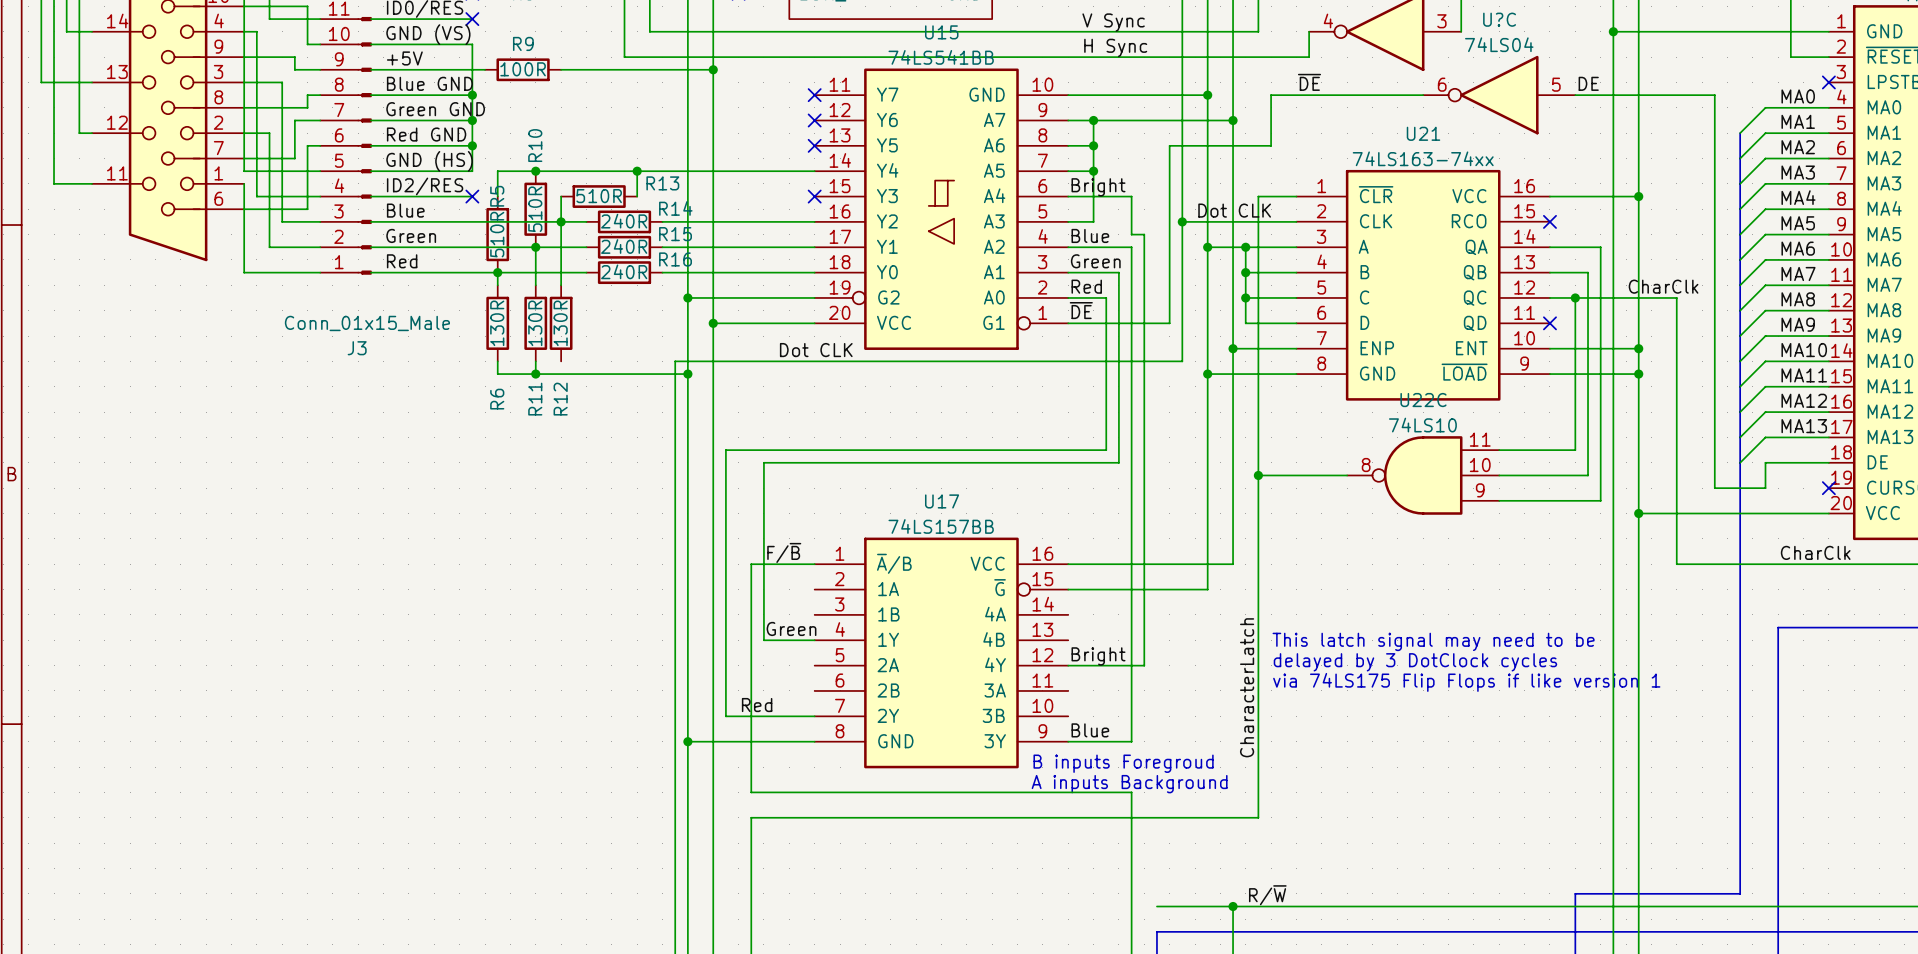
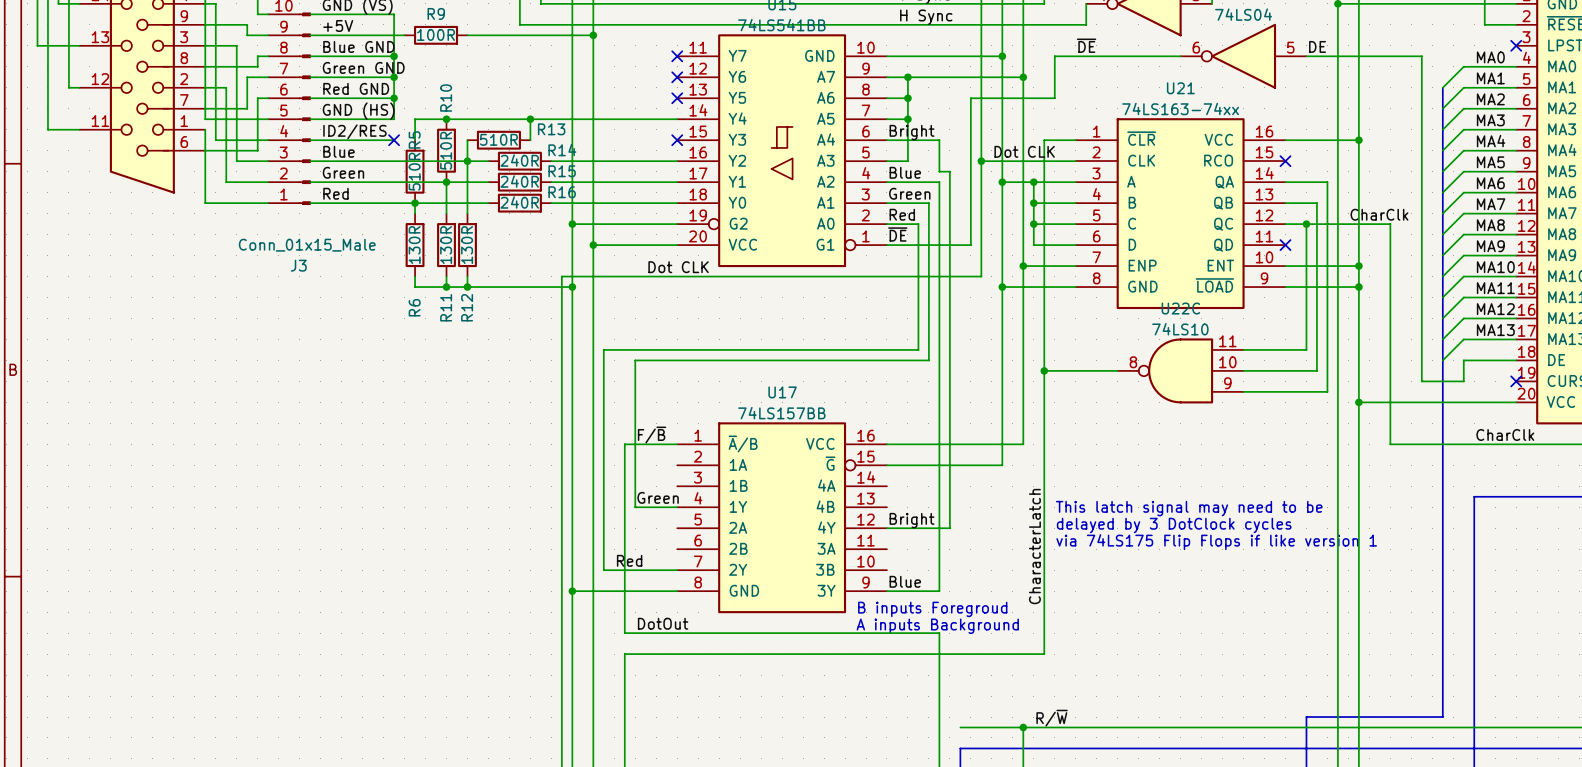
wire: none -> (467, 276) (467, 287)
junction: none -> (467, 287)
label: none -> DotOut (663, 623)

